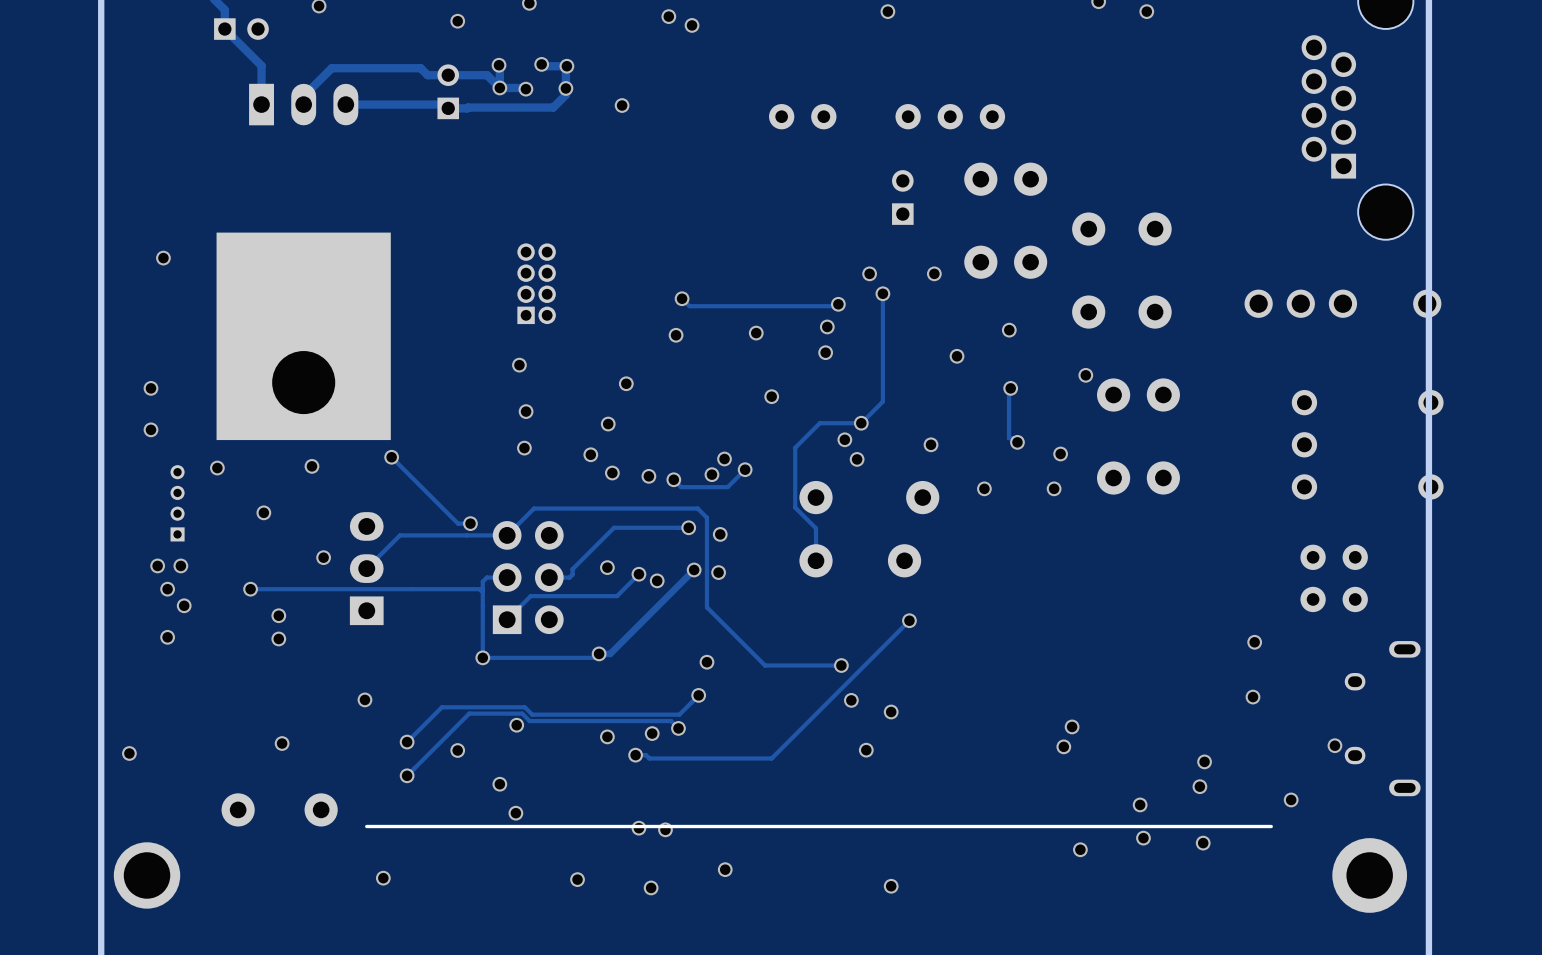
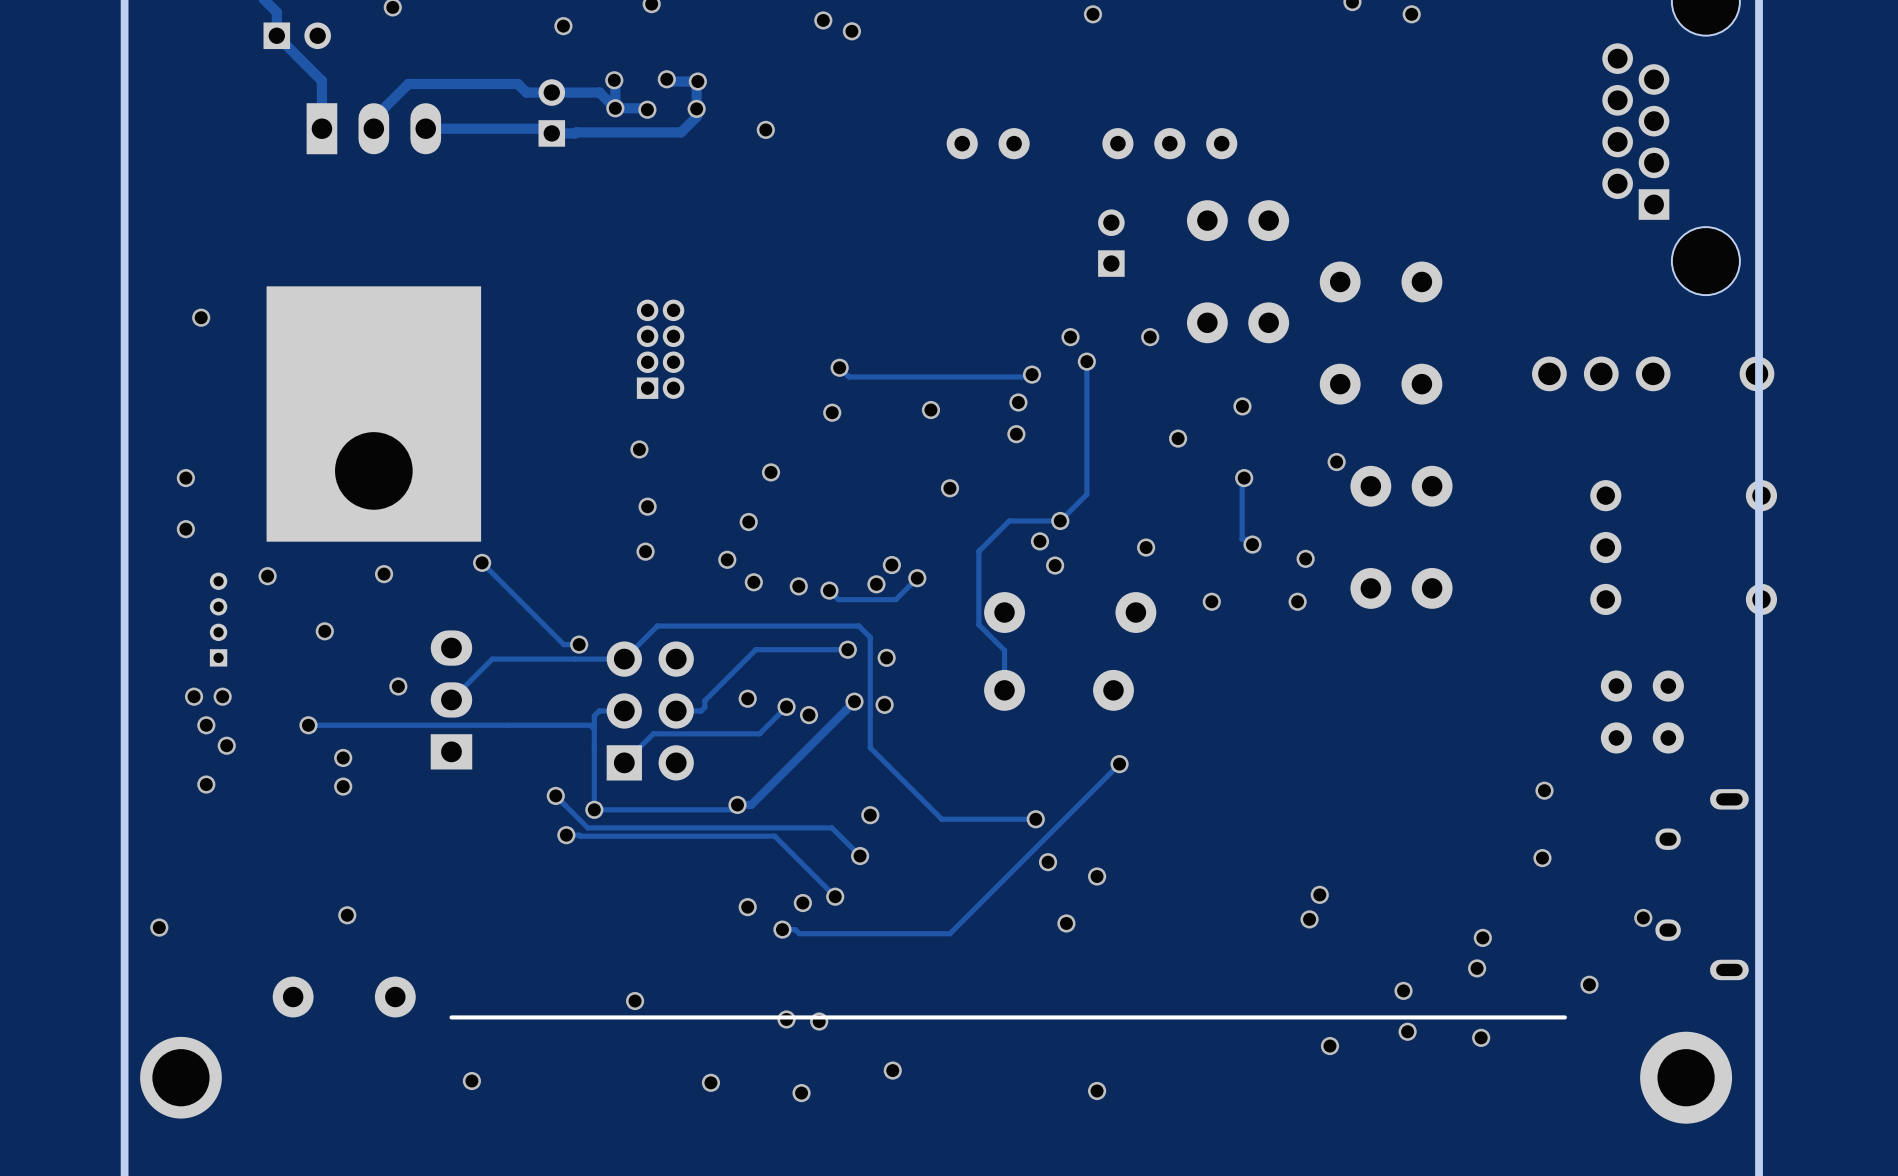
via: none -> (555, 795)
via: none -> (566, 835)
track: (698, 695) (679, 714) (532, 714) (524, 707) (441, 707) (407, 742) -> (860, 856) (831, 827) (587, 827) (555, 795)
via: (364, 699) -> none
track: (671, 721) (529, 721) (522, 713) (469, 713) (407, 775) -> (826, 887) (774, 836) (566, 835)
via: (516, 725) -> none
via: (407, 742) -> none
via: (457, 750) -> none
via: (407, 775) -> none
via: (499, 784) -> none

